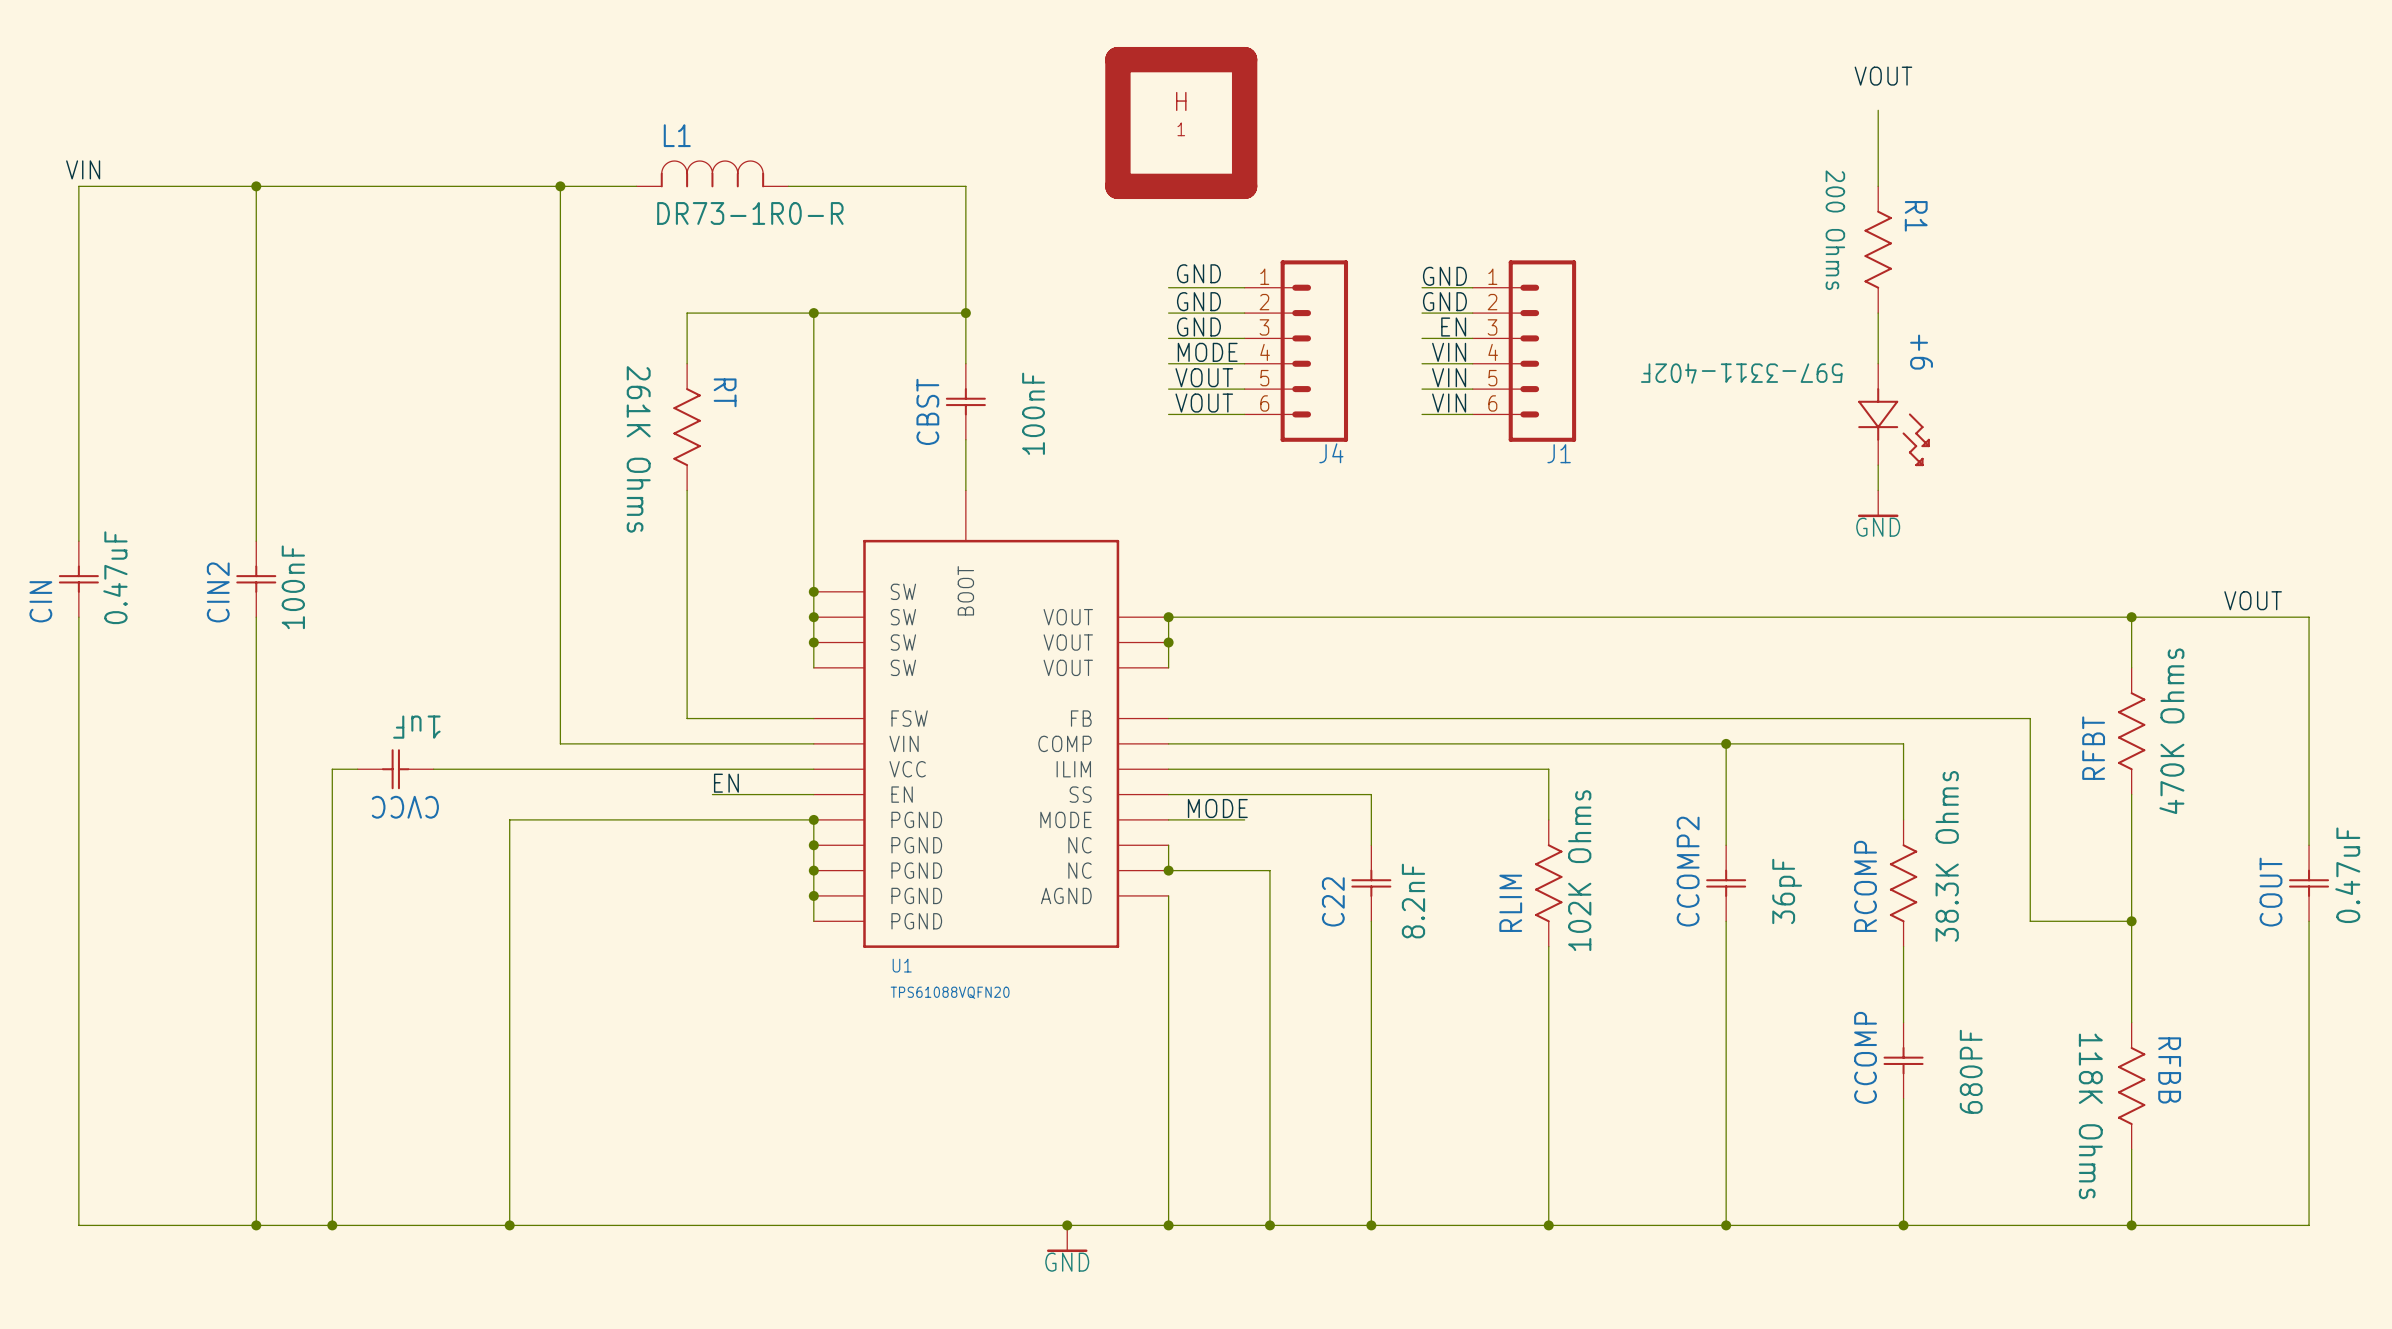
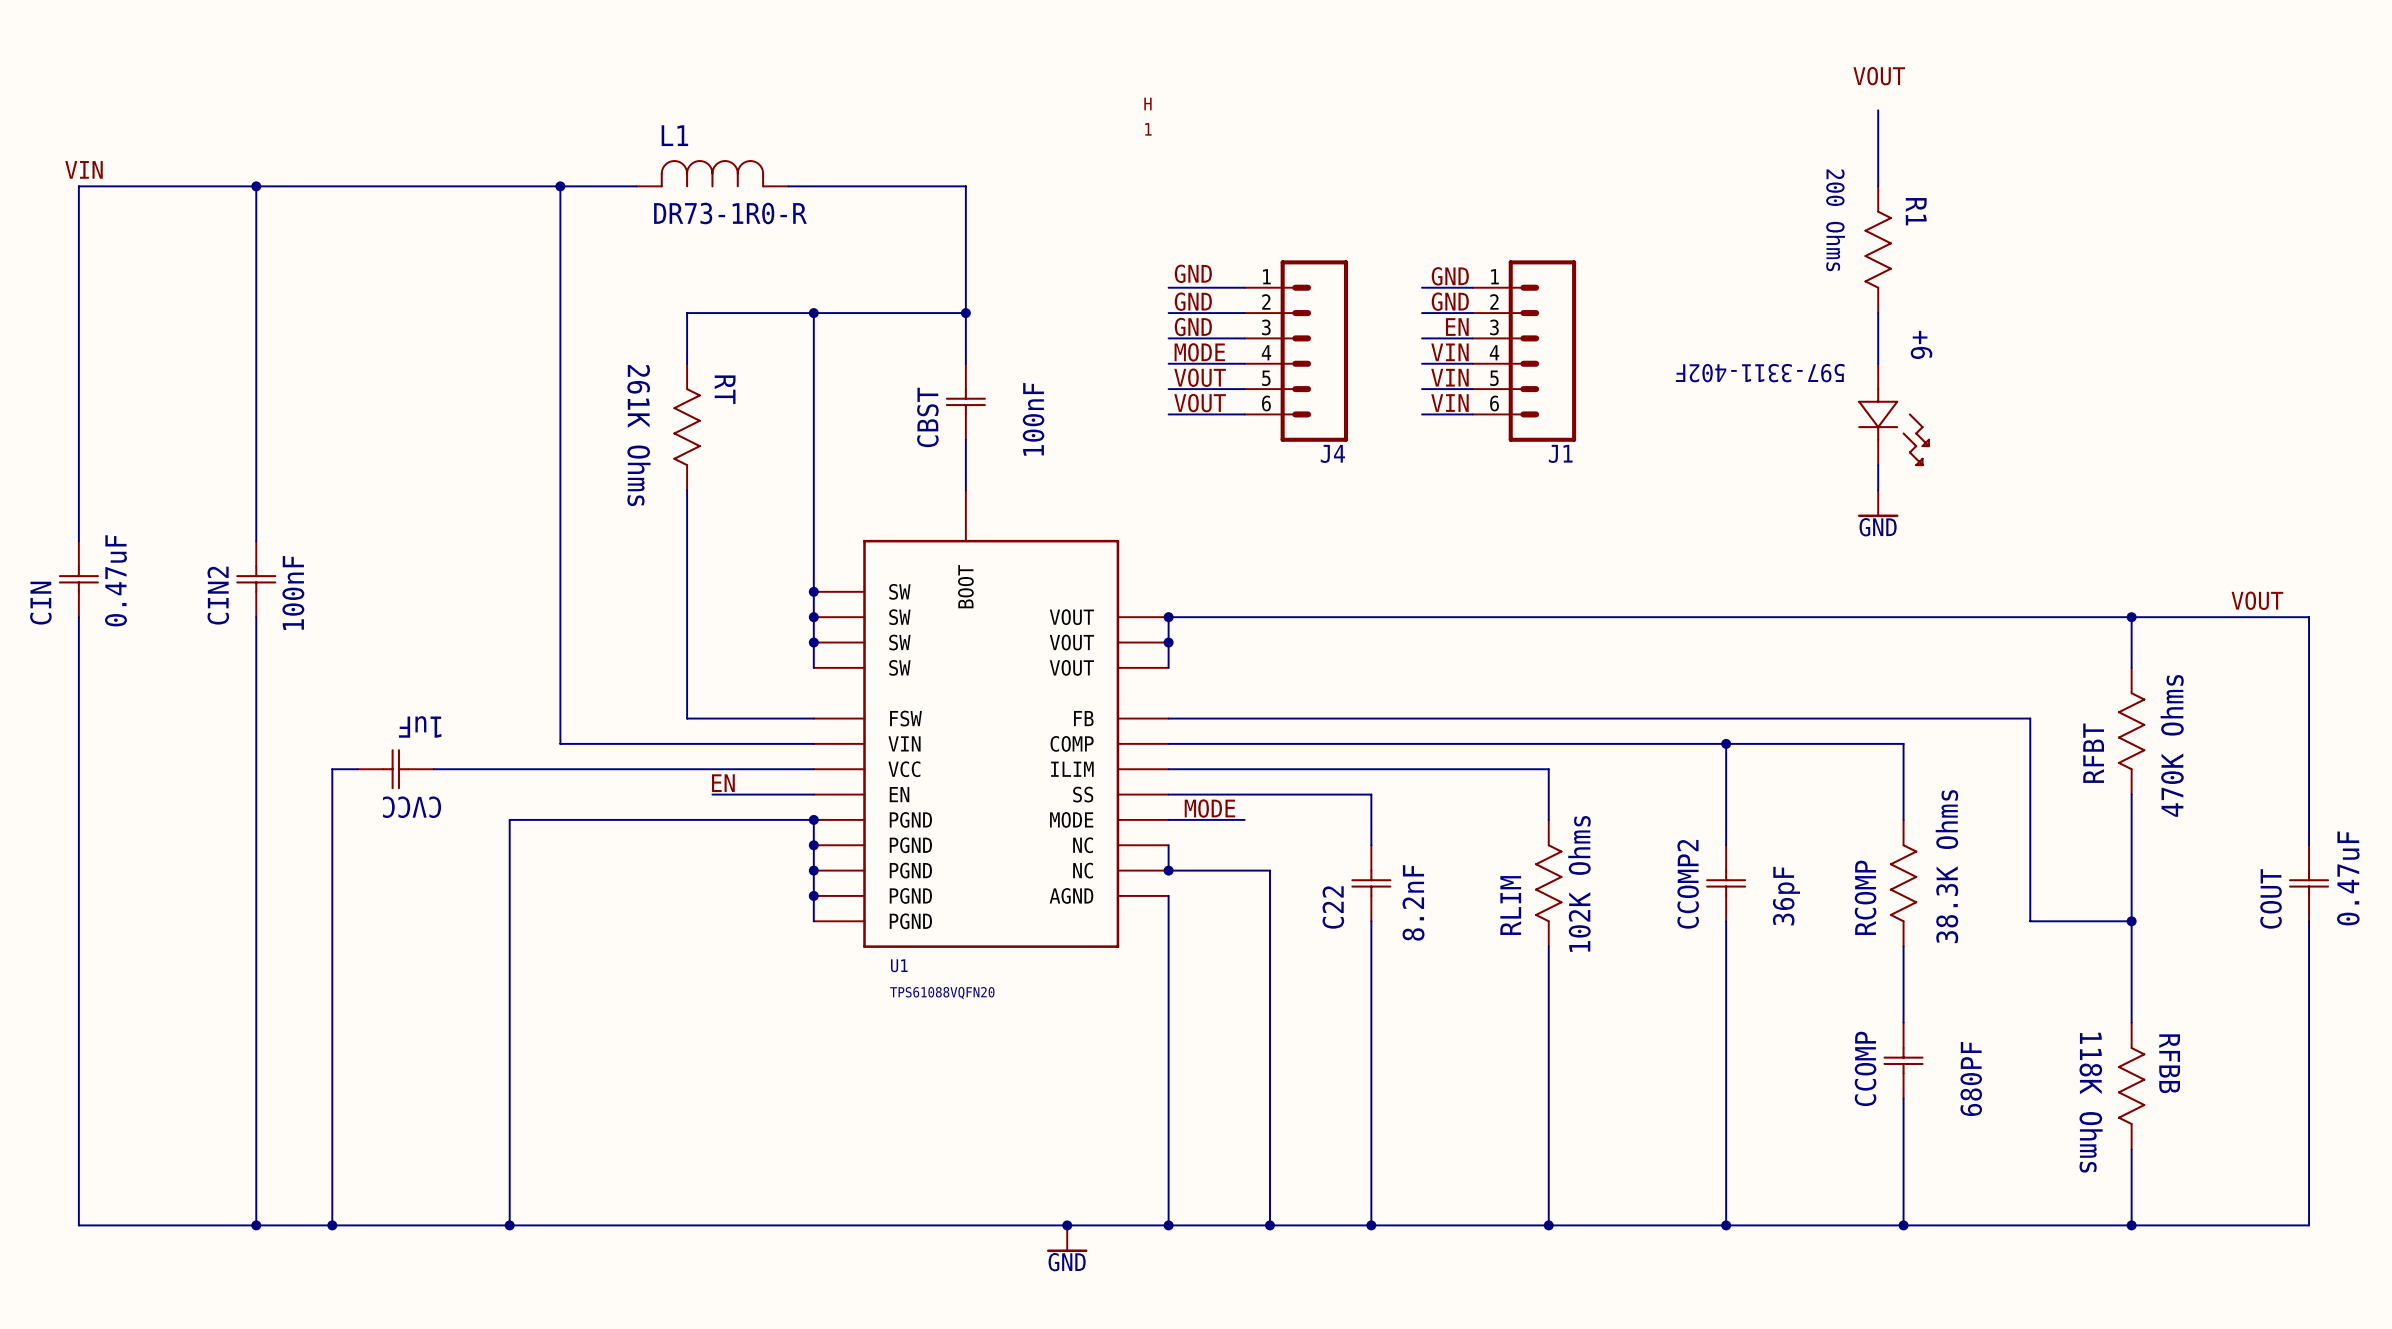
H: none -> 1 (1147, 116)
H: 1 (1181, 123) -> none

